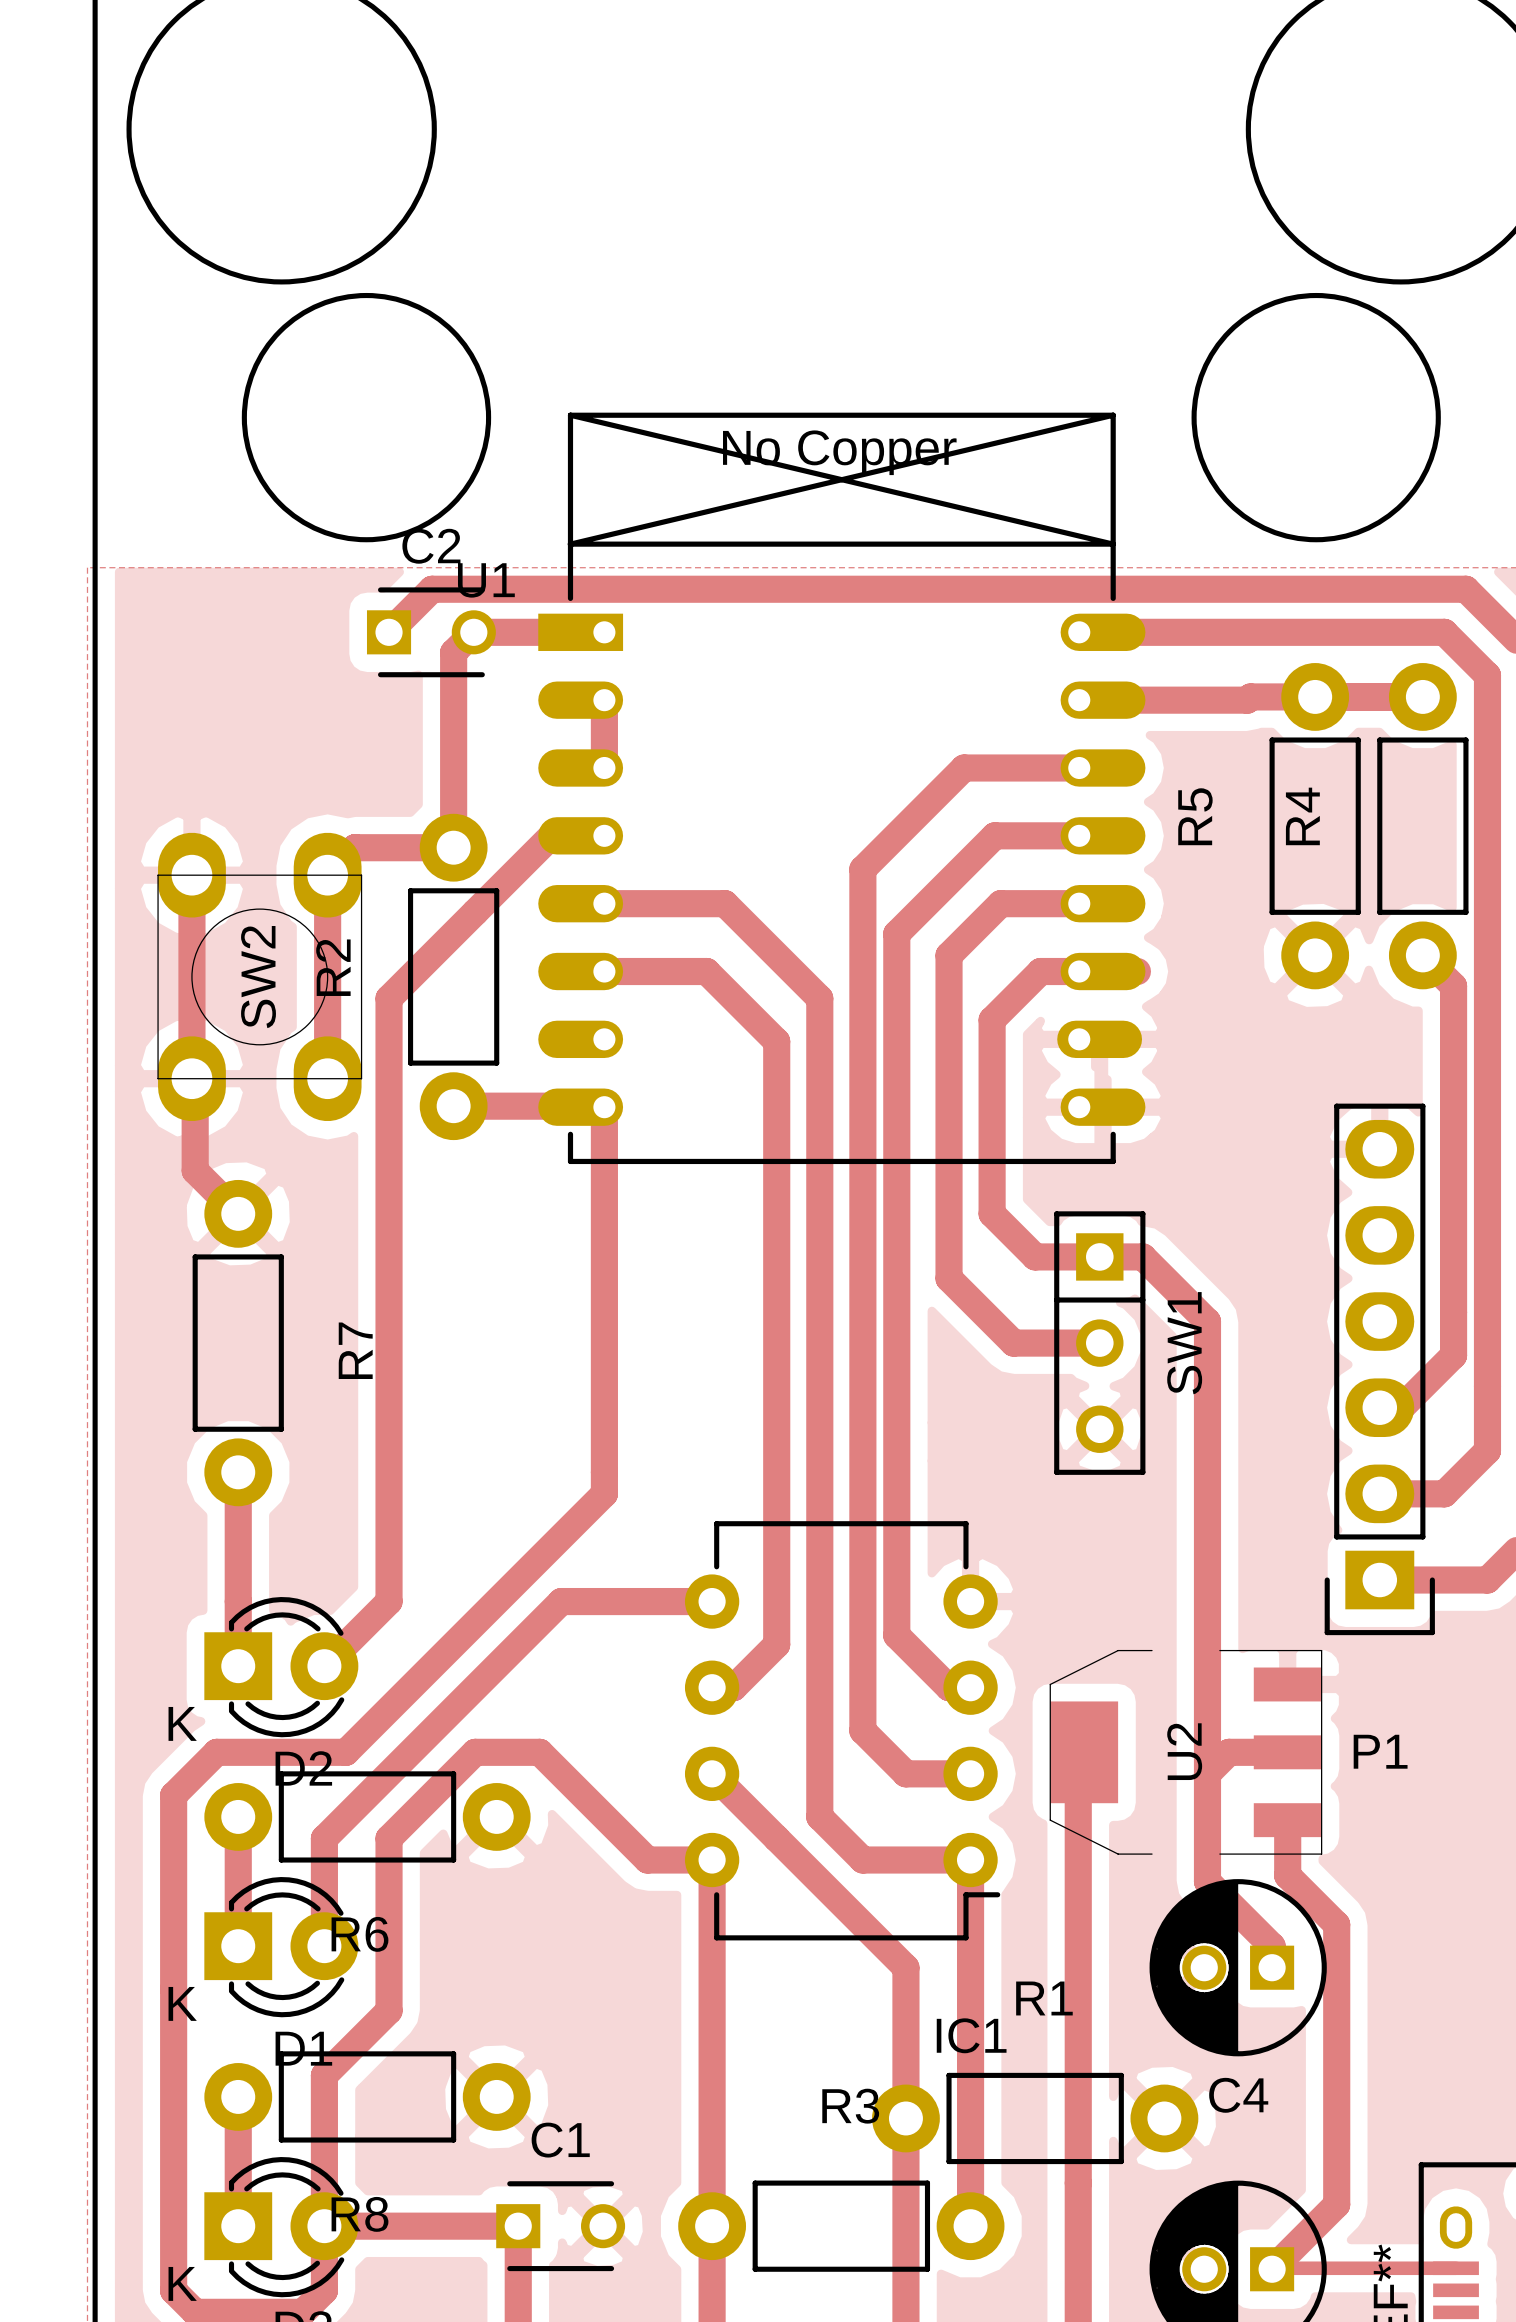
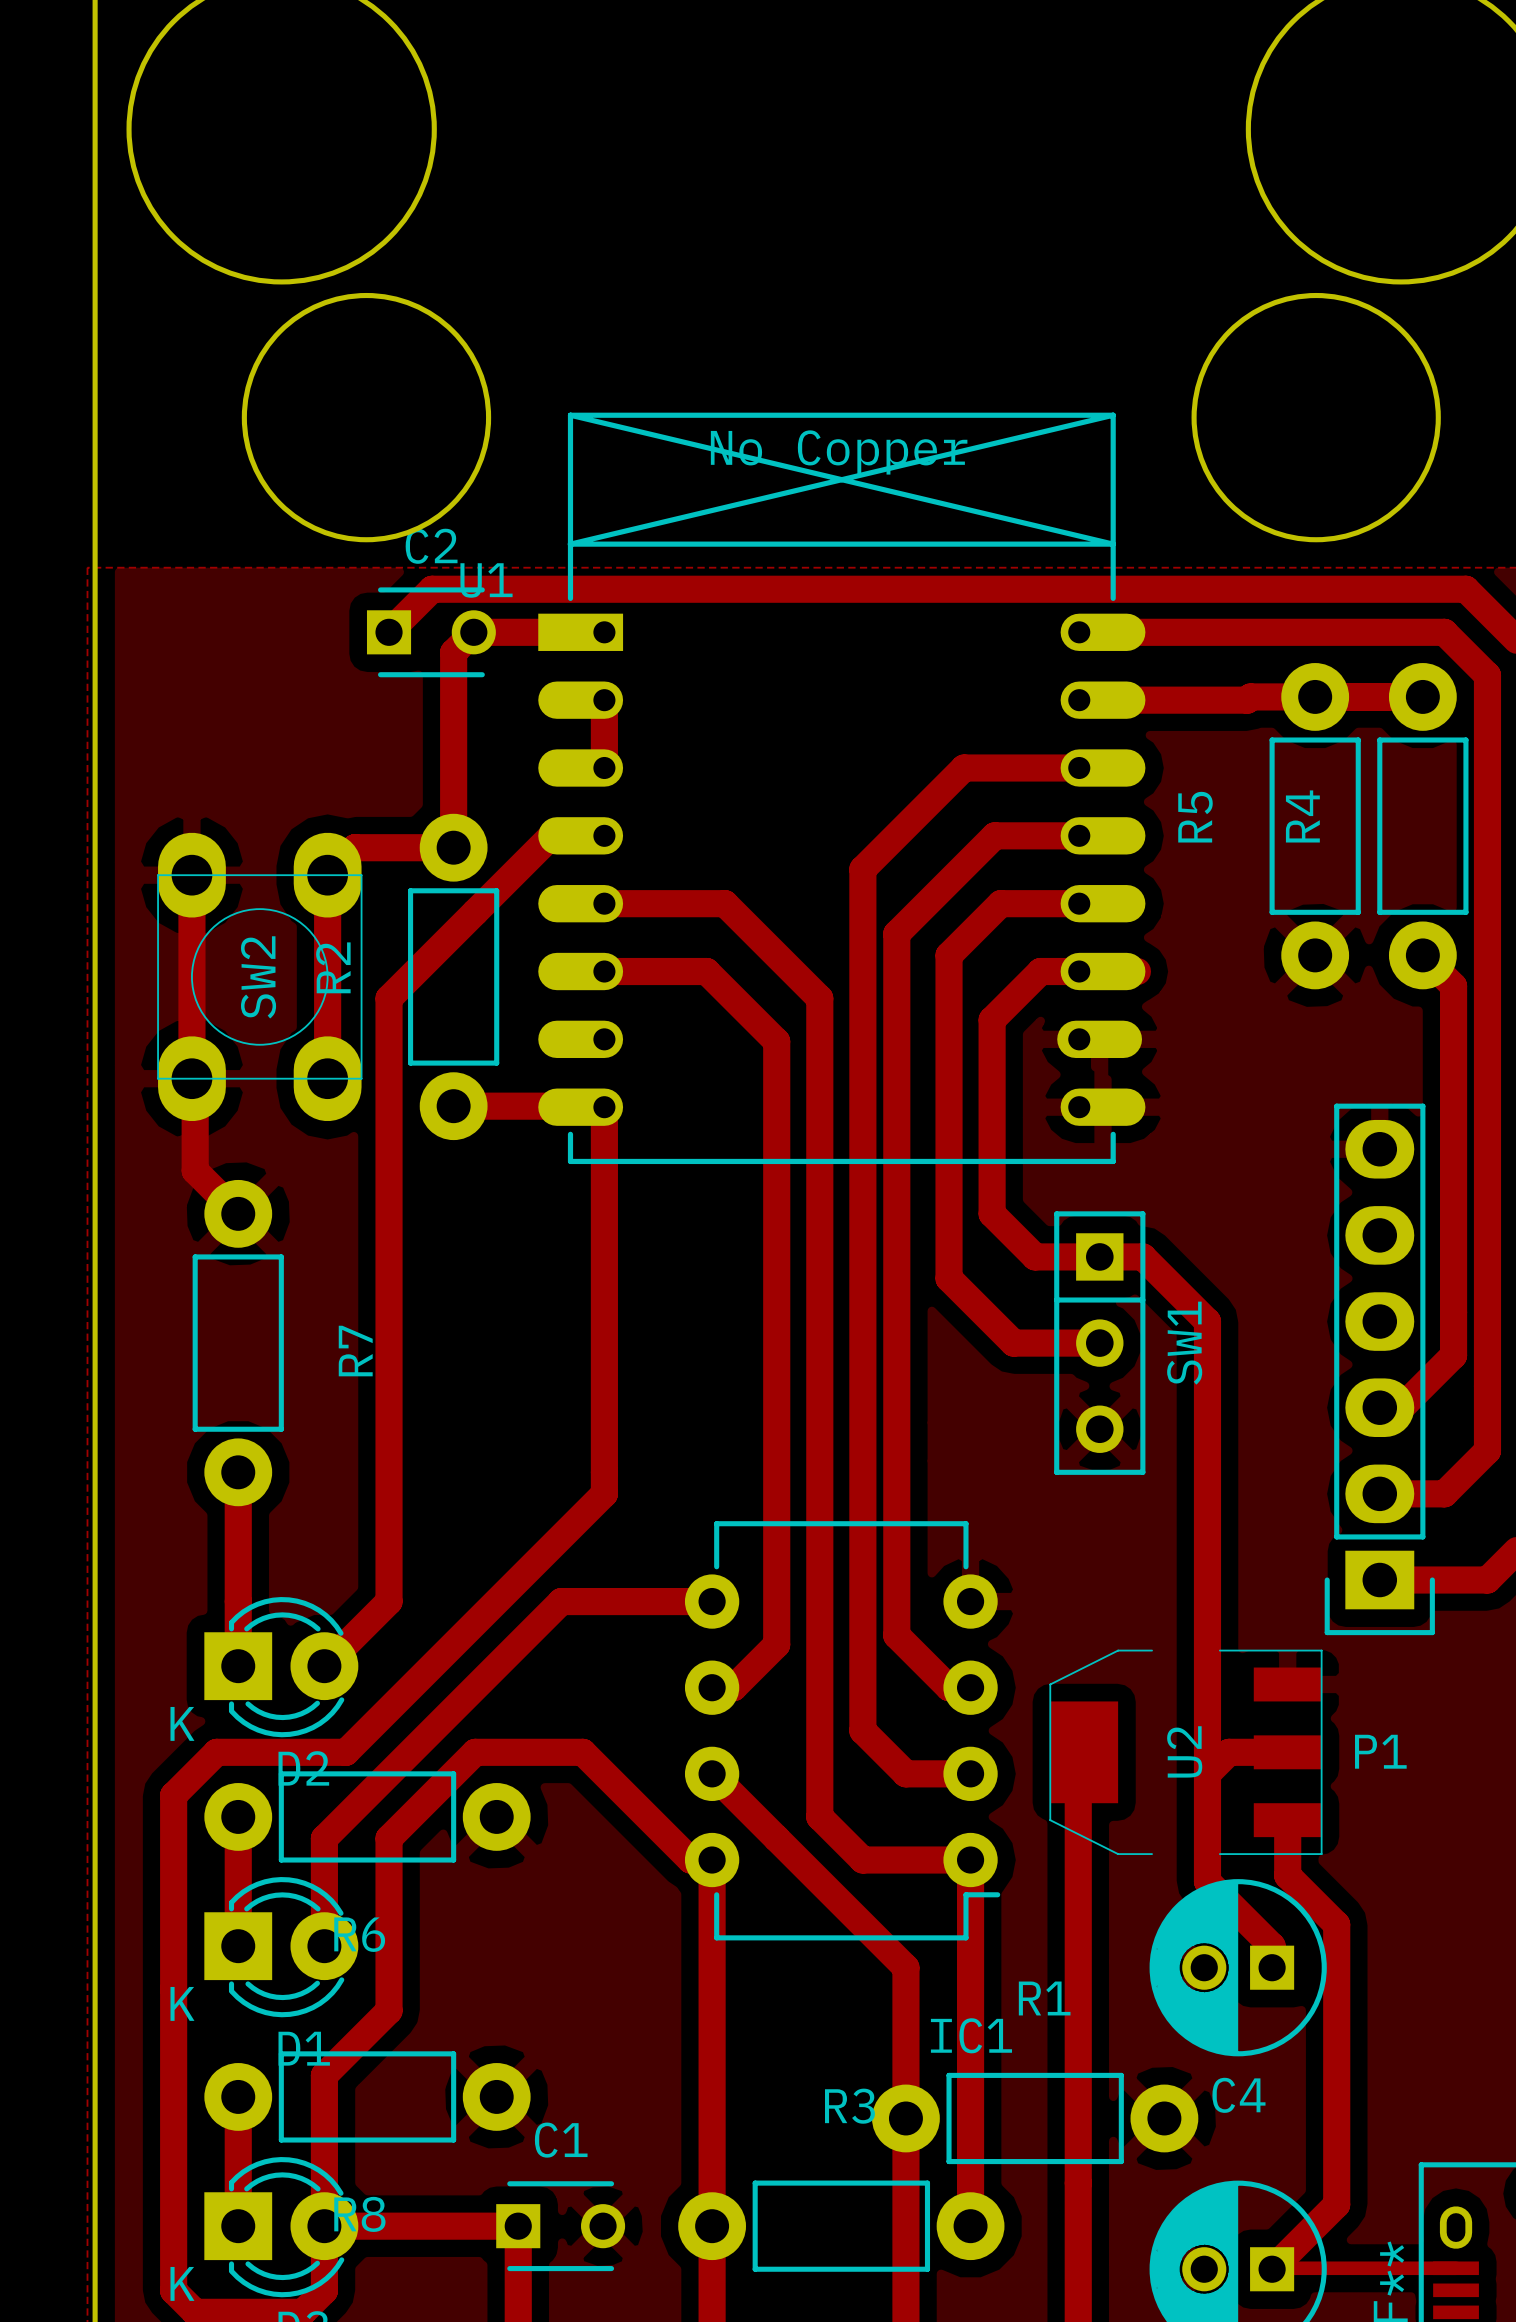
top track: (539, 1752) (647, 1860) (690, 1860) -> (539, 1752) (582, 1752) (690, 1860)

